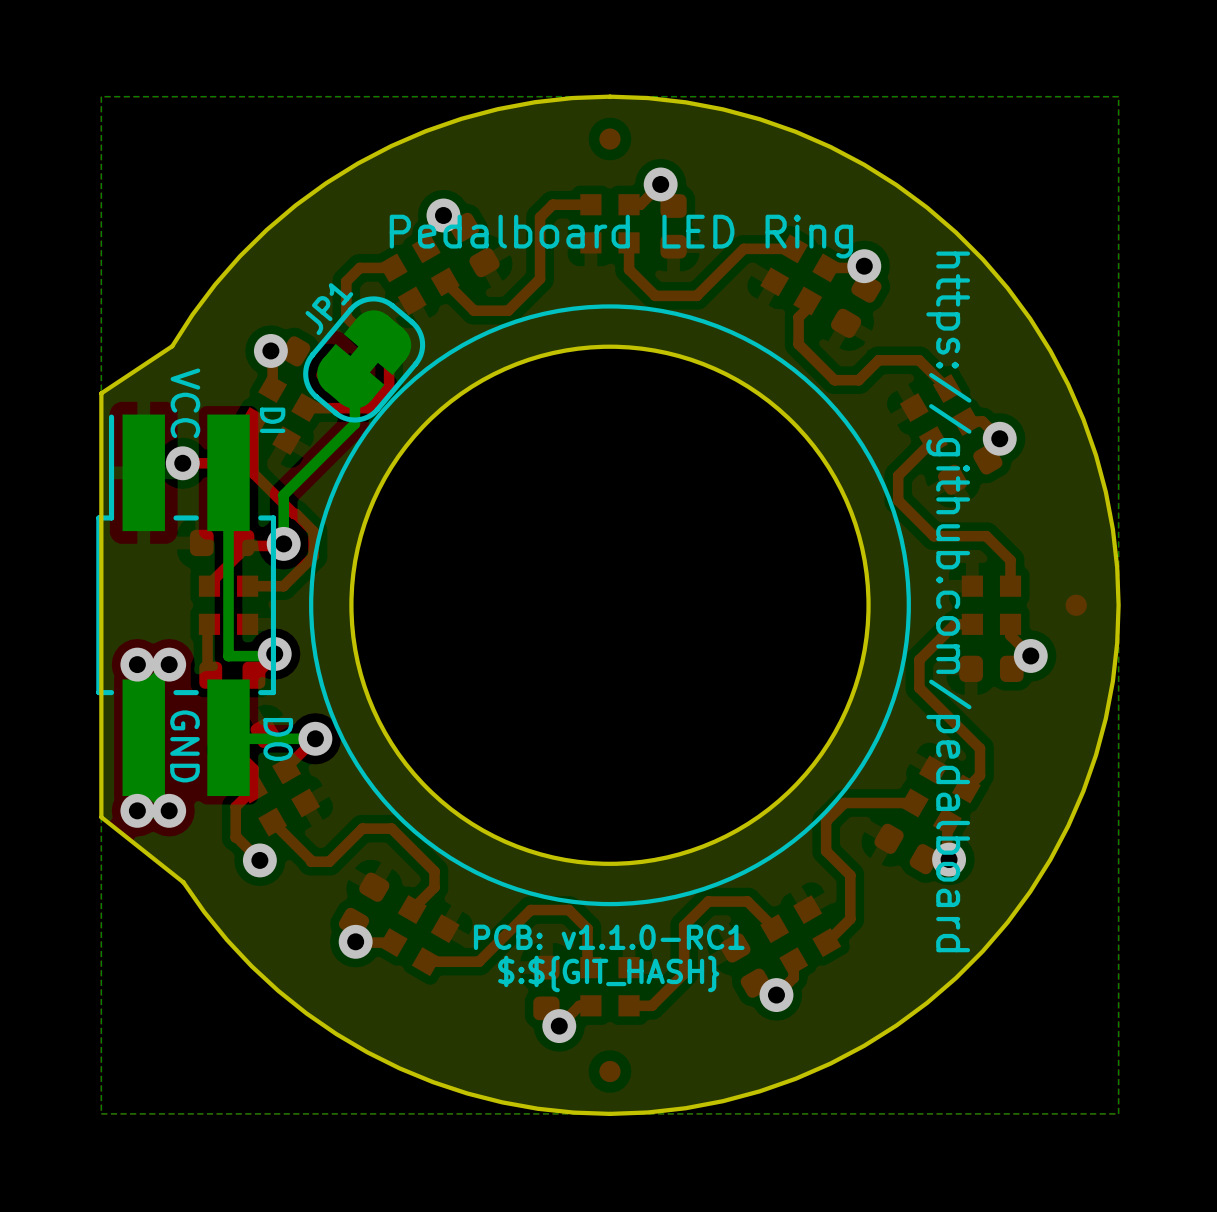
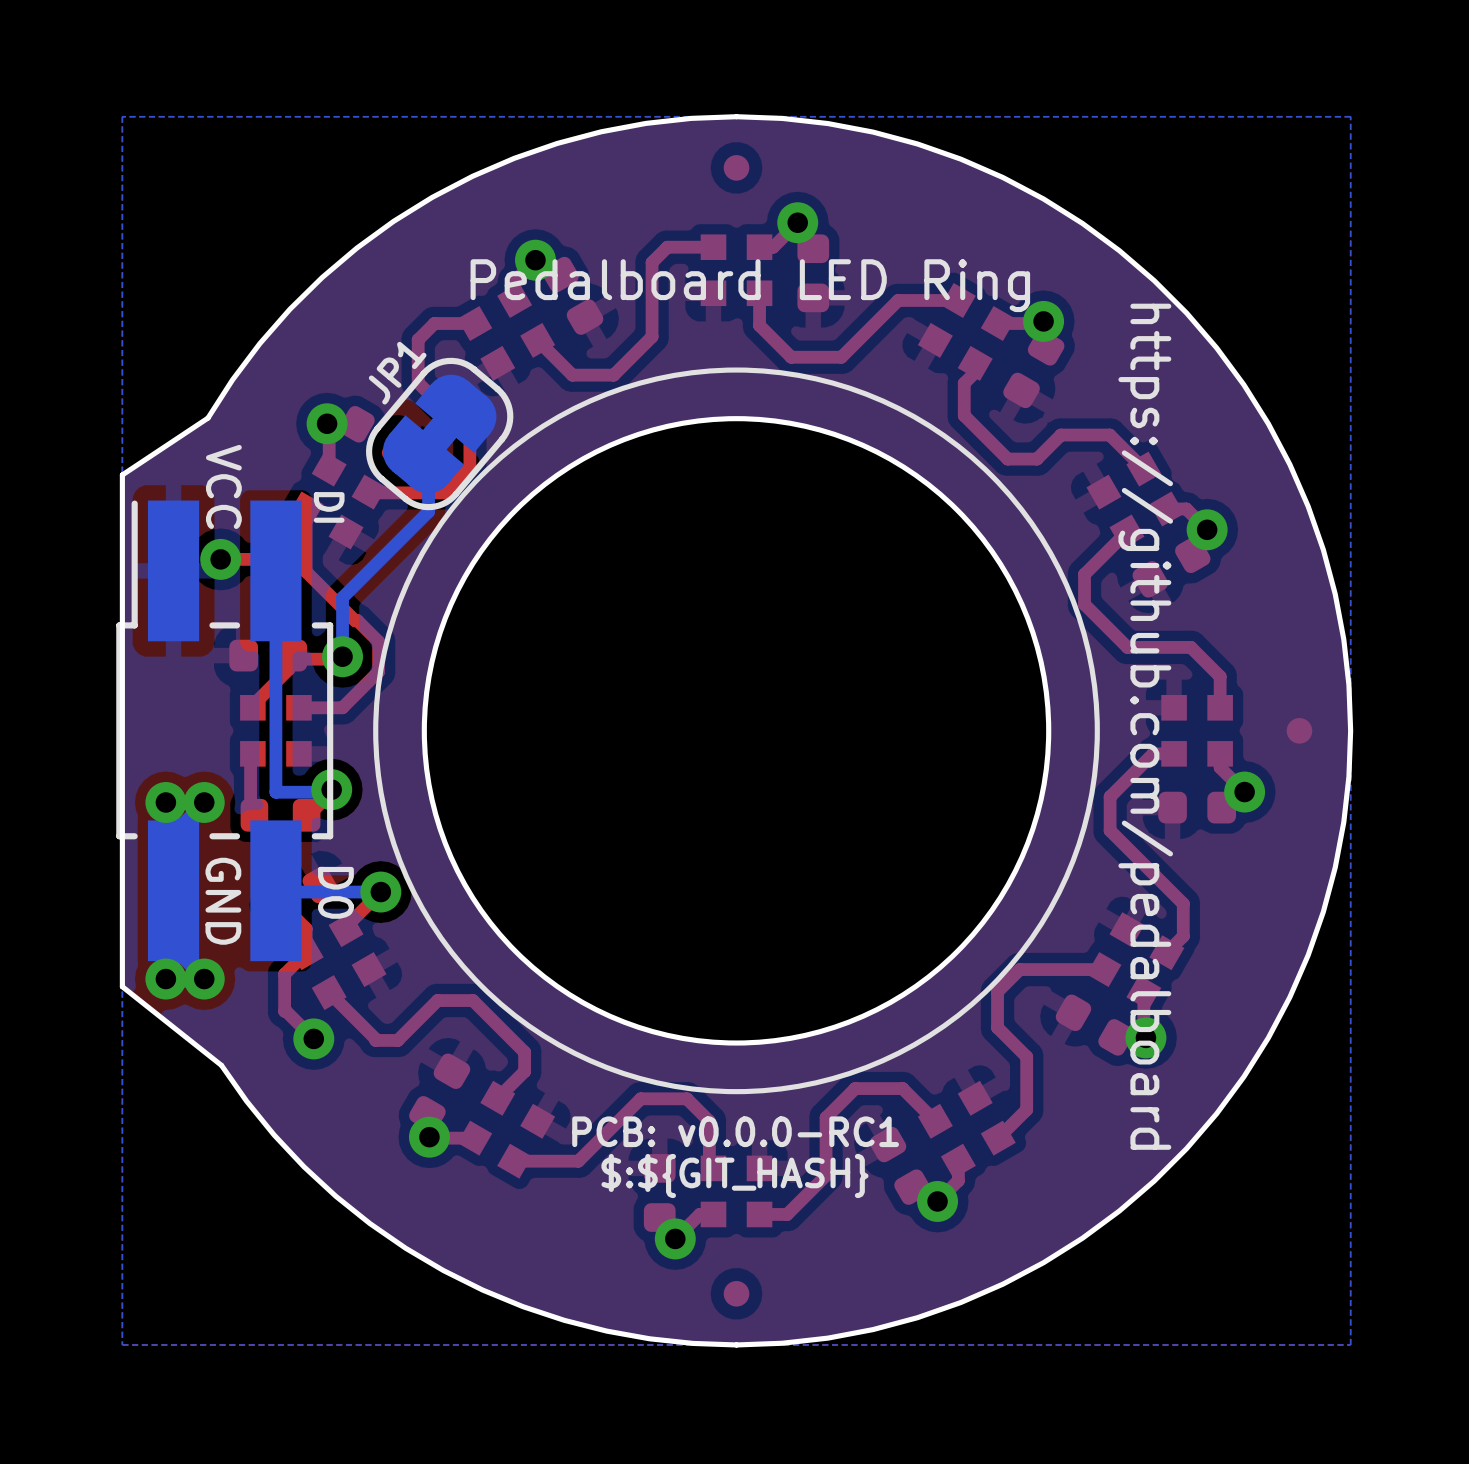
text: PCB: v1.1.0-RC1 (609, 937) -> PCB: v0.0.0-RC1 (735, 1131)

